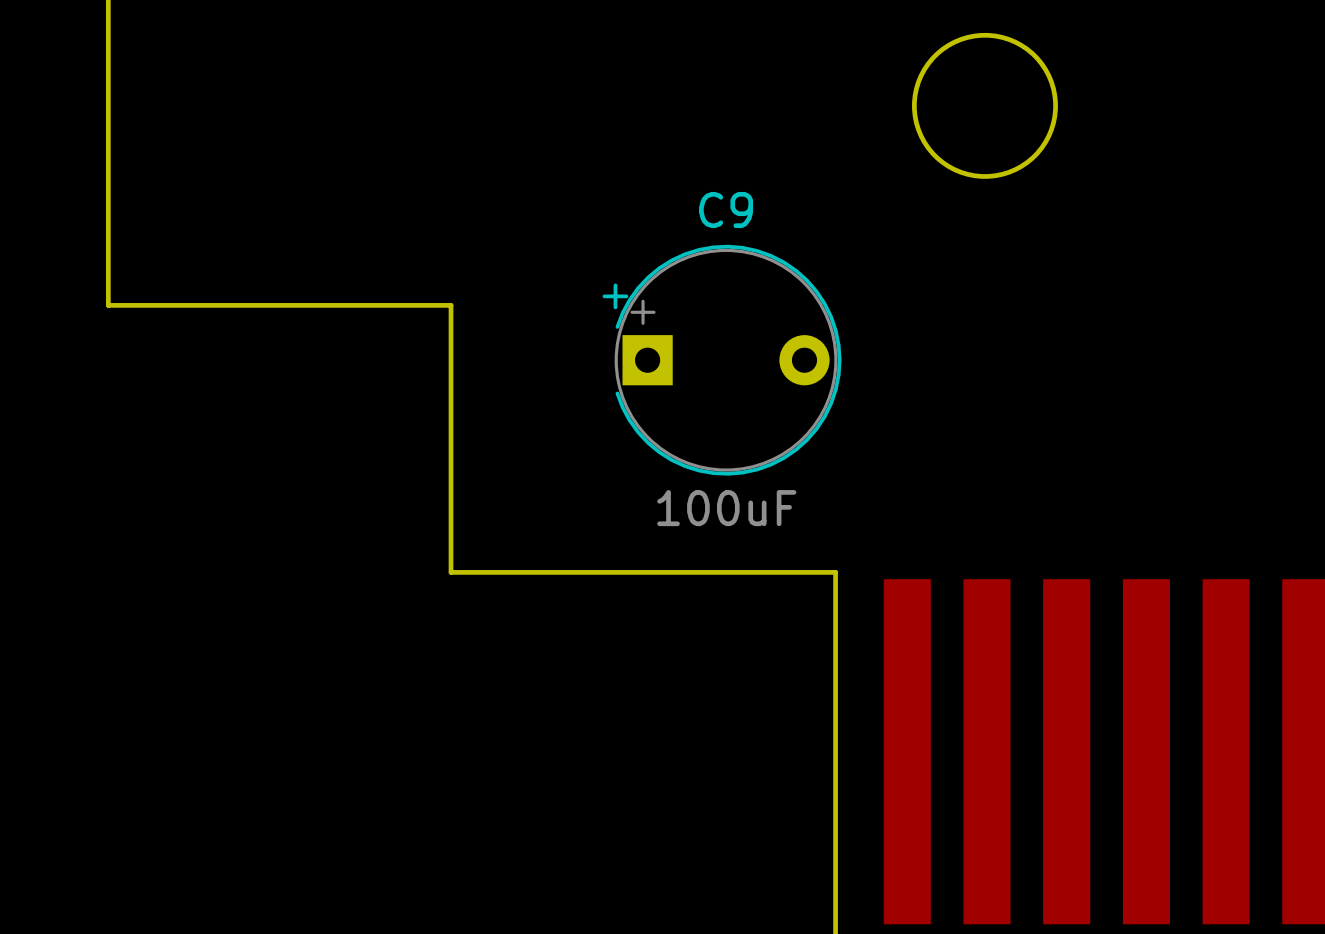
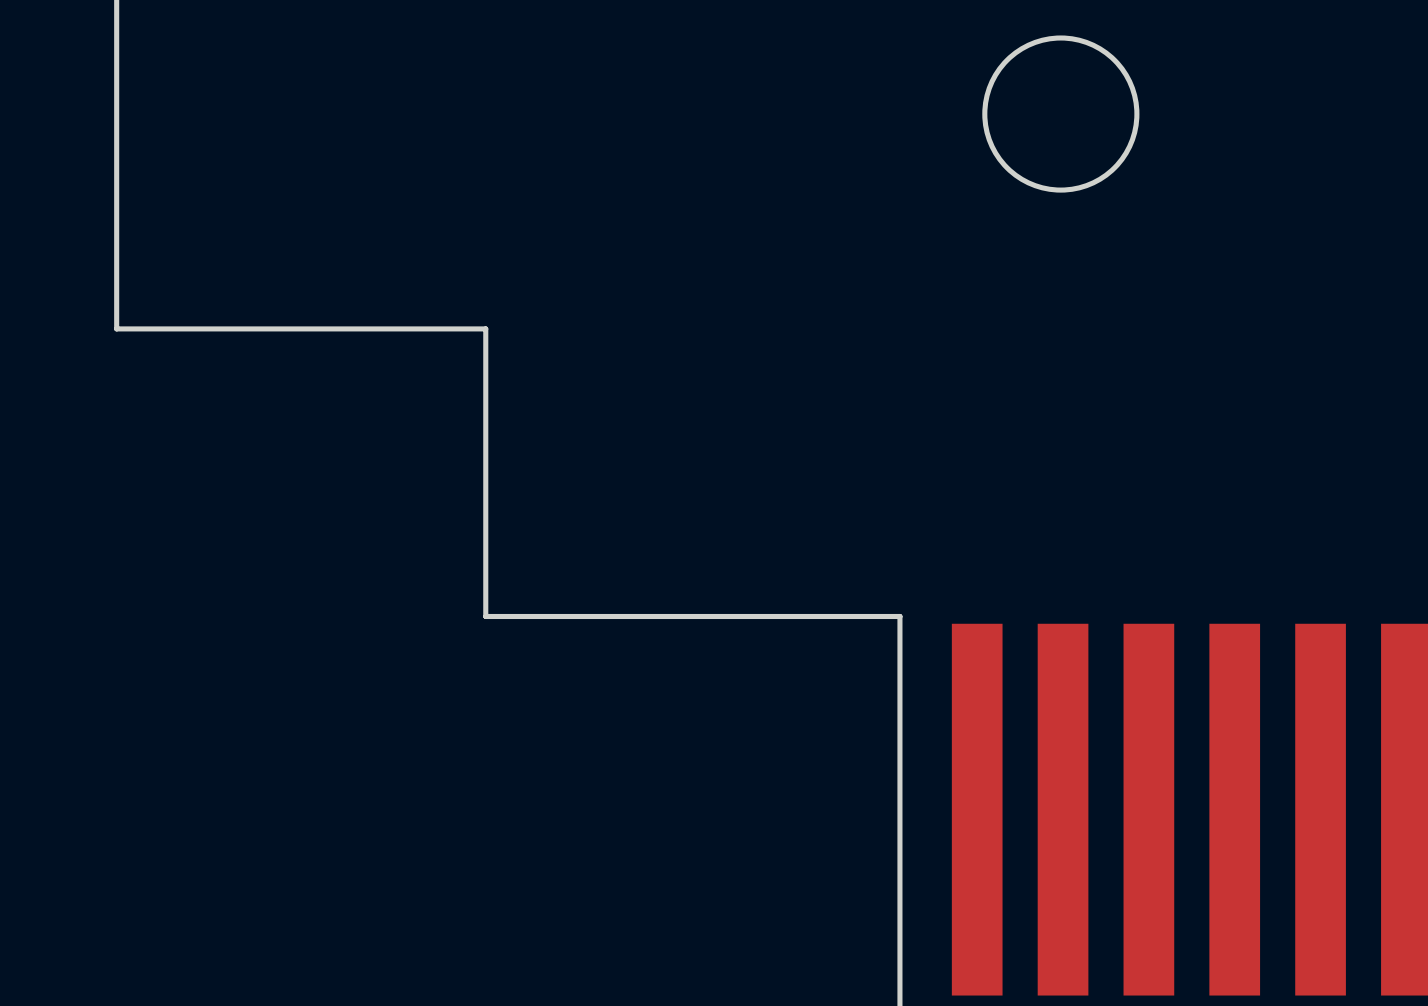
C9: 100uF (722, 360) -> none

